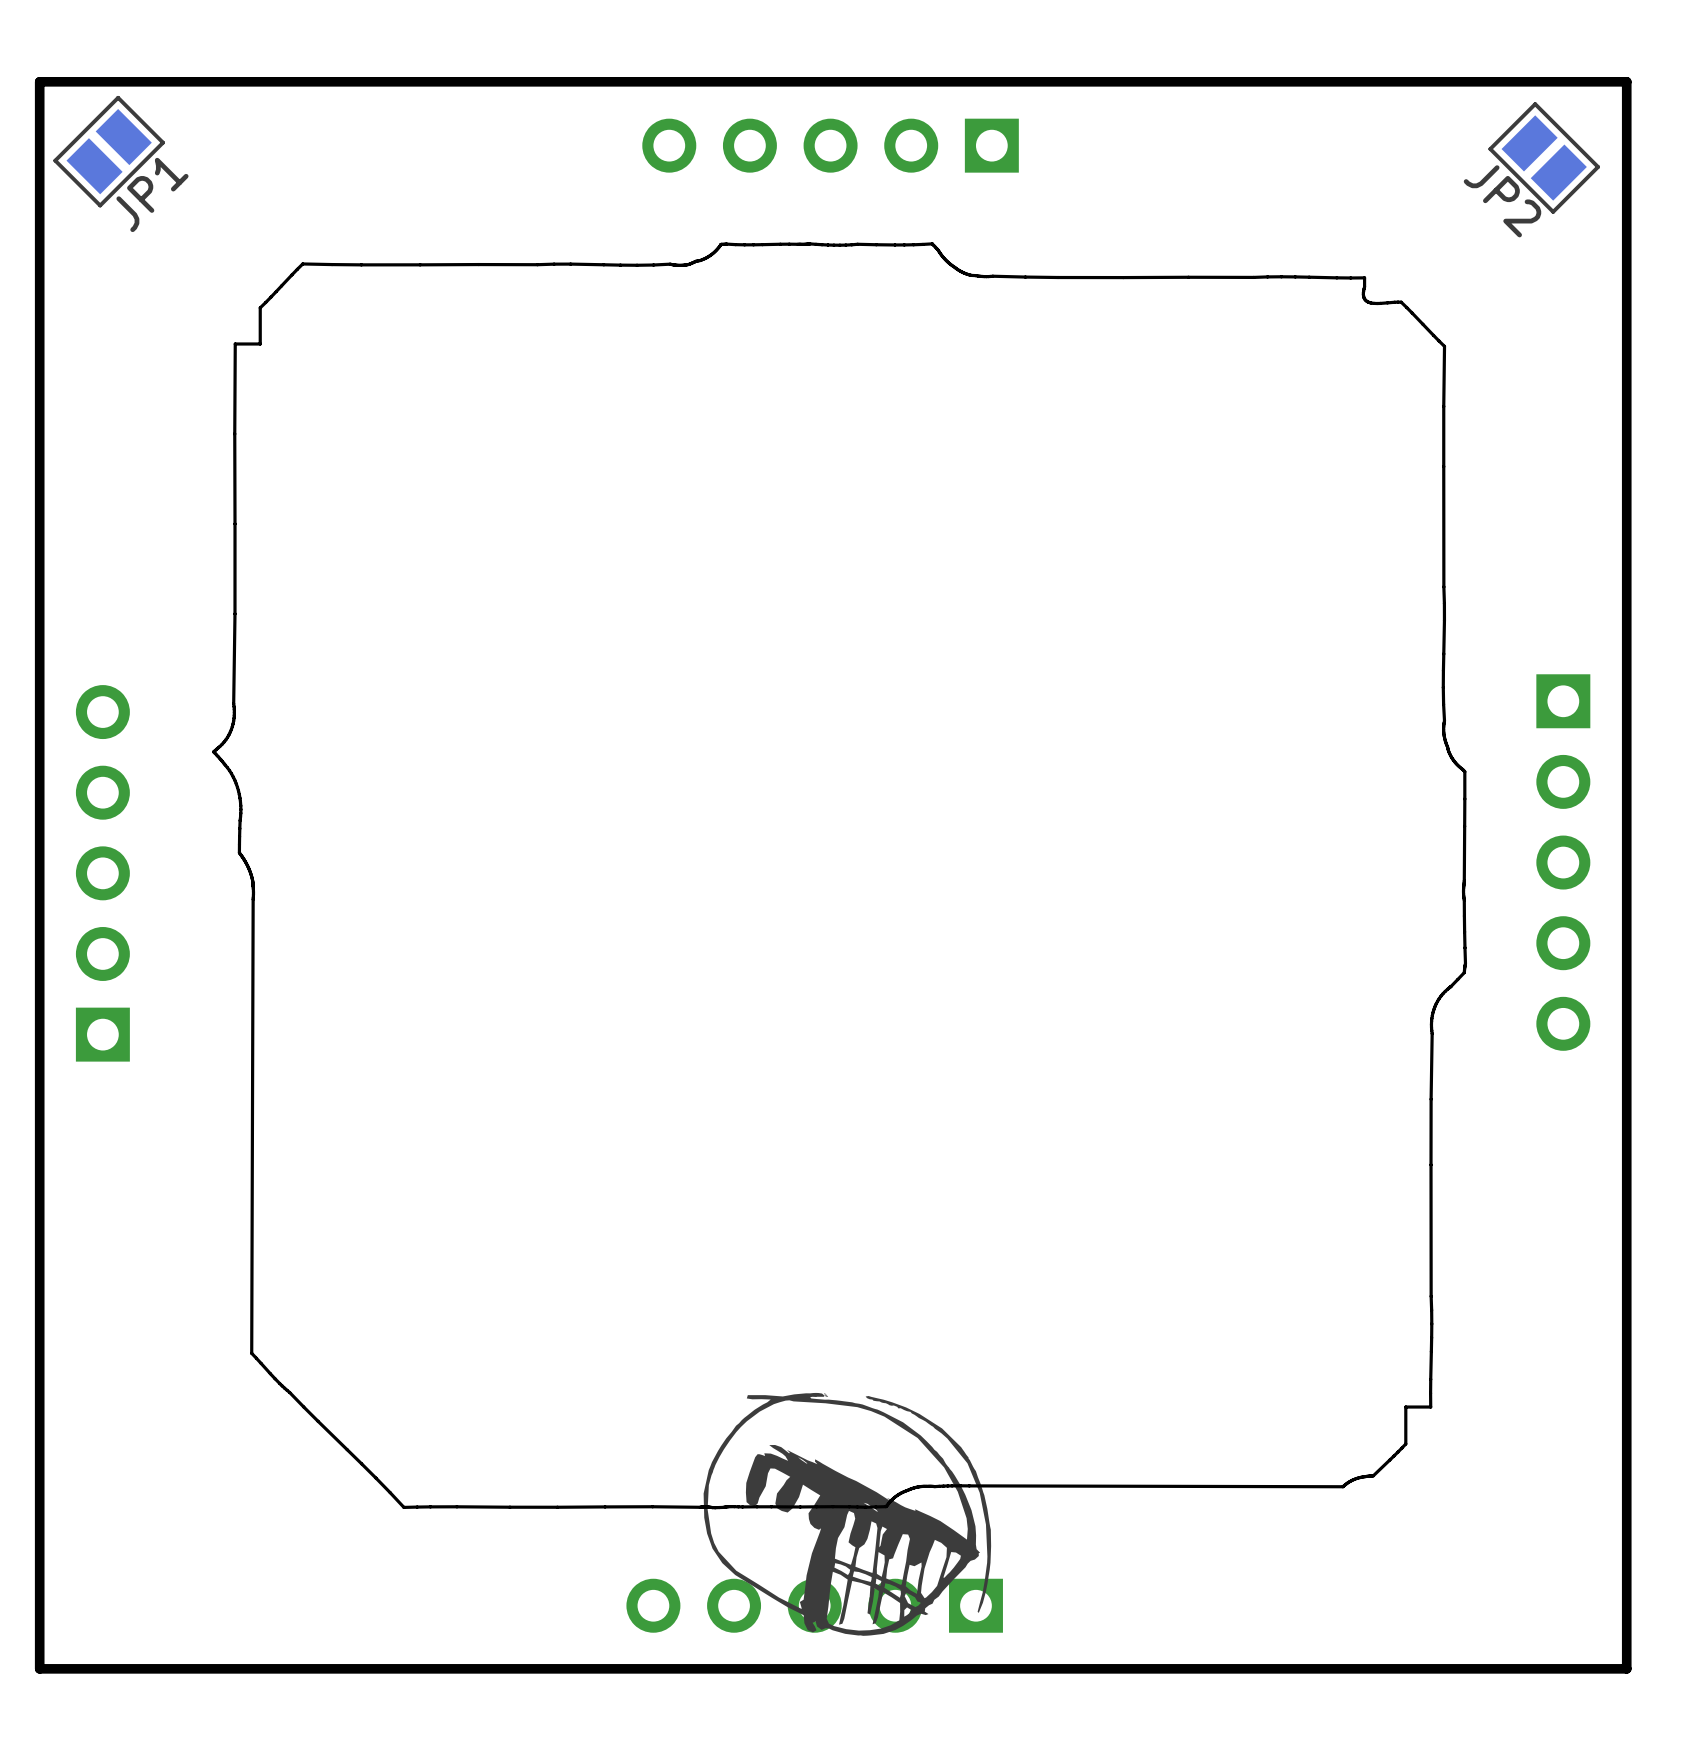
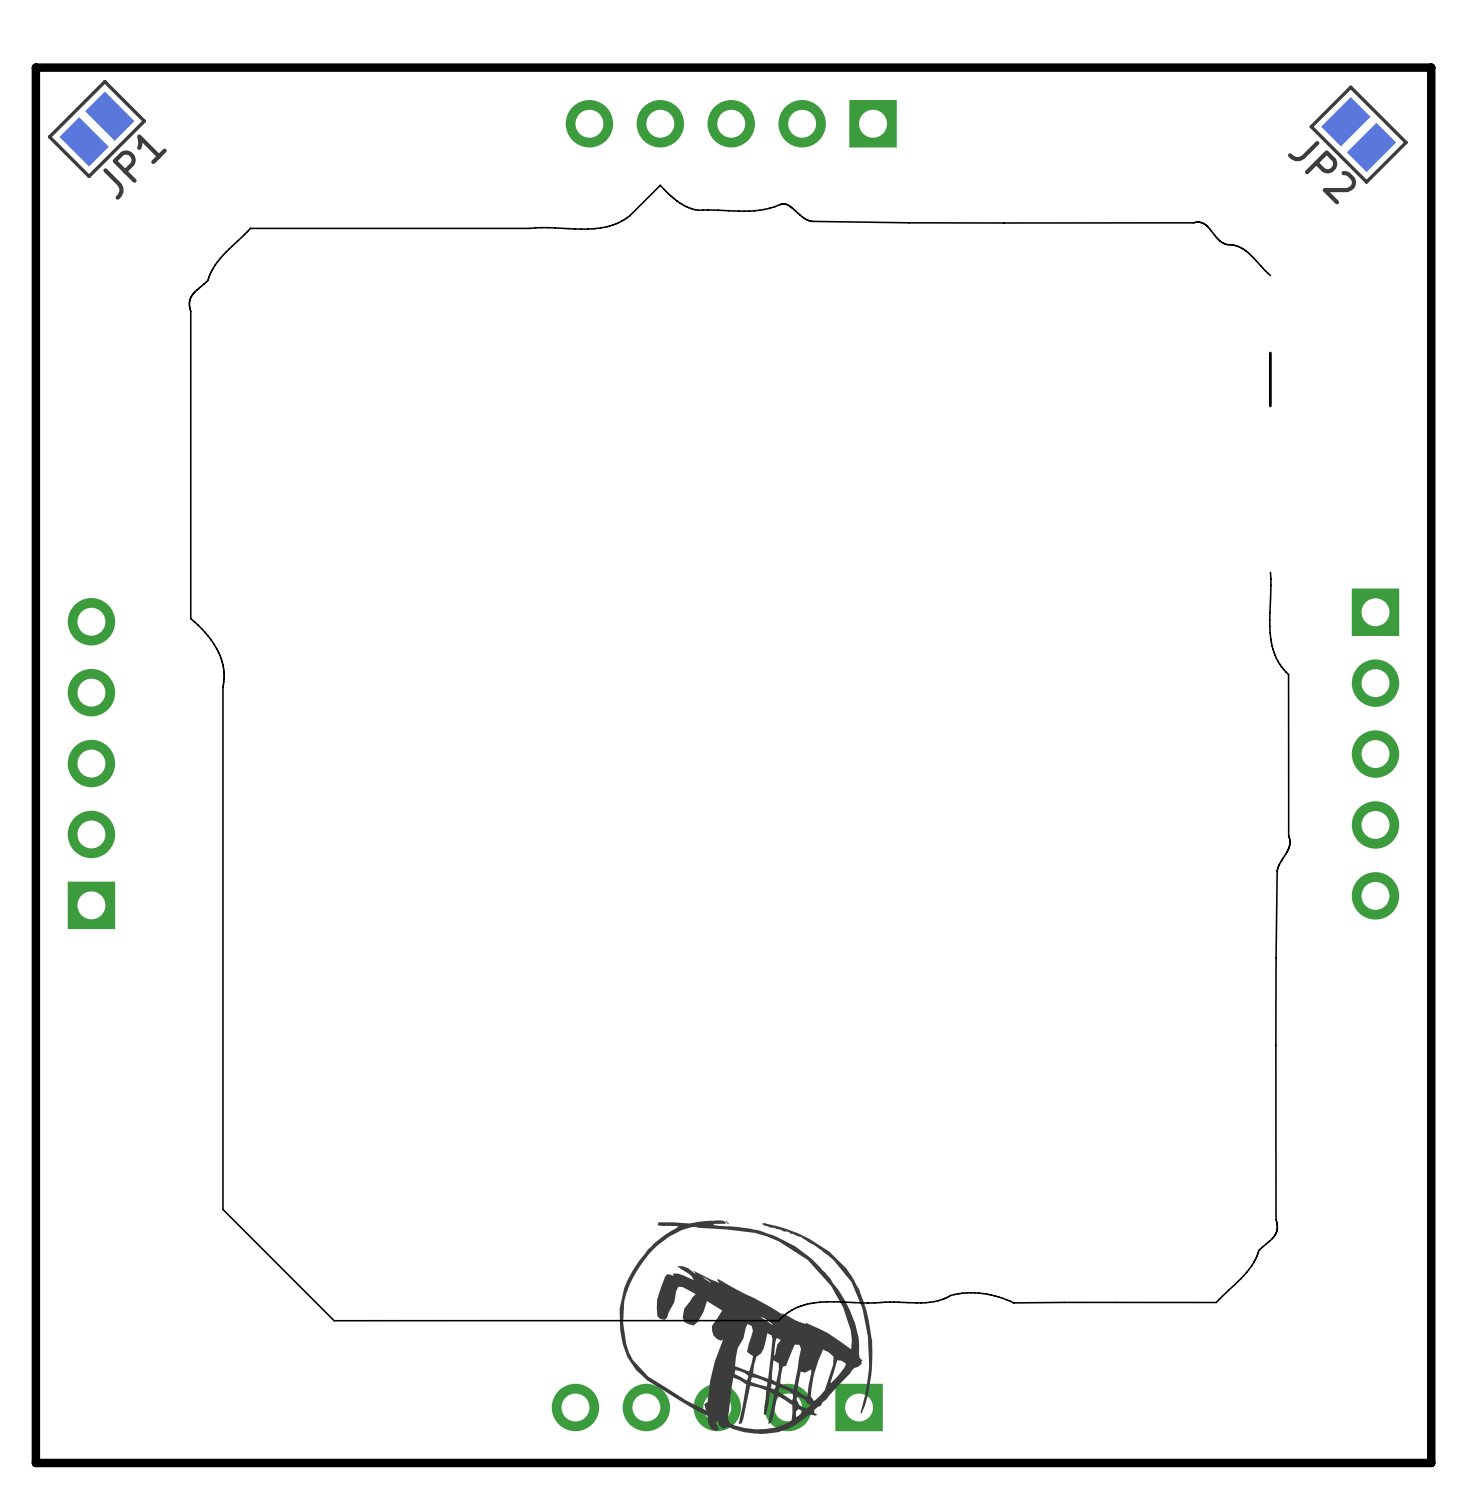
board edge: (720, 244) (706, 257) (681, 265) (302, 263) (260, 307) (260, 343) (235, 343) (234, 715) (229, 734) (213, 751) (229, 770) (237, 787) (240, 805) (239, 852) (248, 867) (252, 882) -> none
board edge: (721, 244) (932, 243) (945, 259) (958, 269) (970, 275) (984, 276) (1364, 277) (1363, 294) (1365, 300) (1374, 303) (1401, 302) (1444, 346) (1443, 406) -> none
board edge: none -> (1270, 275) (1246, 251) (1237, 246) (1222, 242) (1206, 225) (1199, 222) (813, 221) (805, 219) (784, 203) (754, 210) (694, 209) (677, 201) (660, 185) (624, 219) (609, 225) (594, 228) (250, 228) (220, 258) (207, 280) (192, 294) (189, 303) (190, 618) (214, 644) (221, 659) (224, 674) (222, 1209) (334, 1320) (778, 1320) (795, 1308) (813, 1302) (925, 1302) (938, 1300) (954, 1294) (970, 1292) (990, 1294) (1013, 1302) (1216, 1302) (1246, 1272) (1258, 1250) (1273, 1236) (1277, 1227) (1277, 871) (1289, 843) (1288, 674) (1277, 661) (1271, 642) (1270, 572)
board edge: (1443, 466) (1443, 731) (1450, 755) (1464, 771) (1463, 891) (1465, 963) (1464, 972) (1451, 986) -> none
board edge: (253, 886) (251, 1353) (403, 1507) (886, 1506) -> none
board edge: (1447, 989) (1436, 1003) (1431, 1021) (1430, 1407) (1405, 1407) (1405, 1443) (1373, 1475) (1355, 1478) (1343, 1486) (922, 1486) (899, 1493) (886, 1506) -> none

